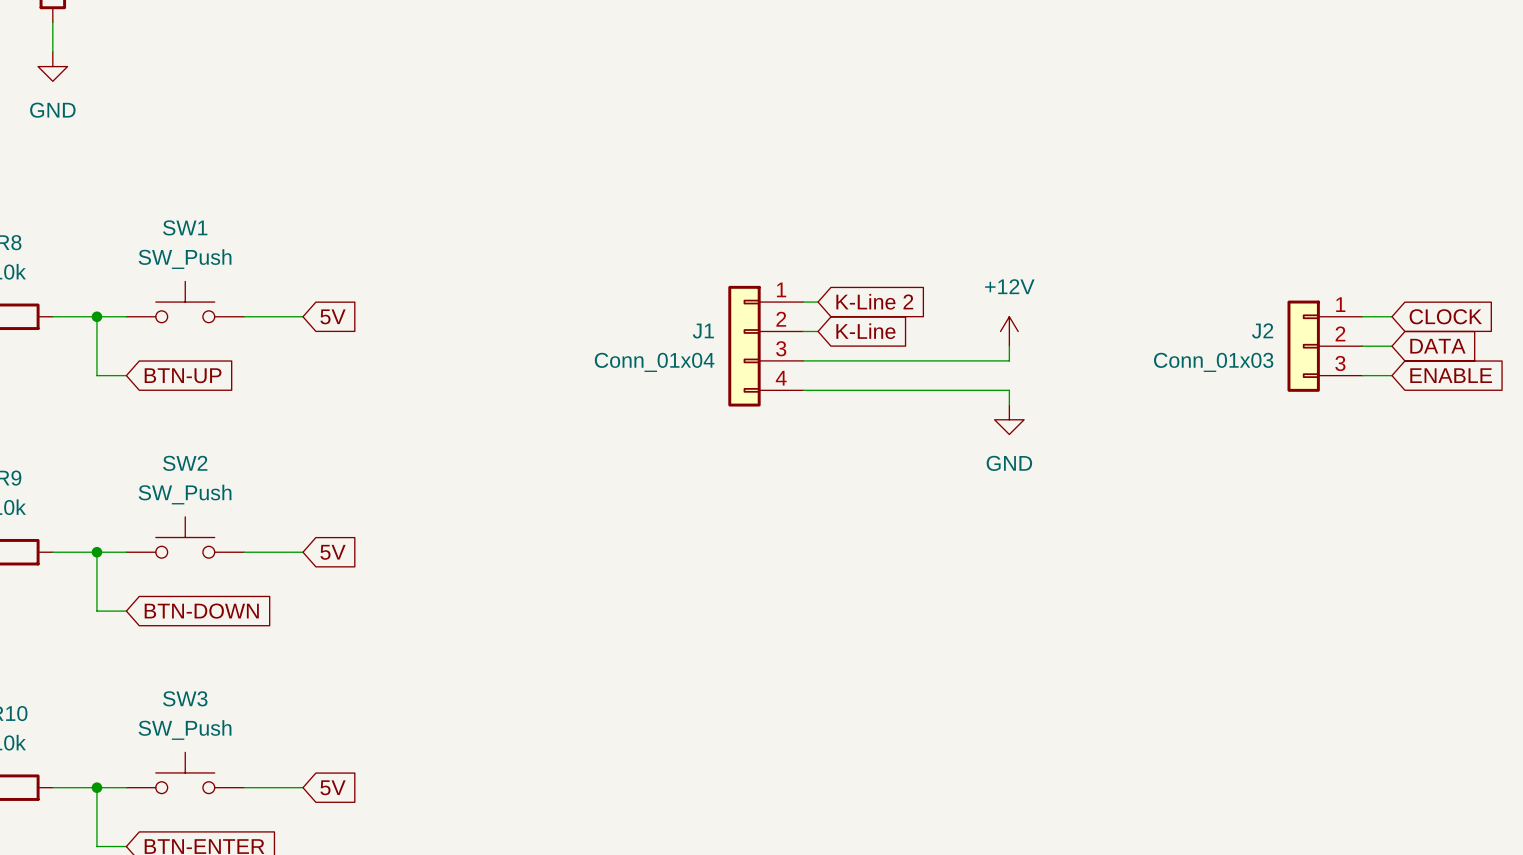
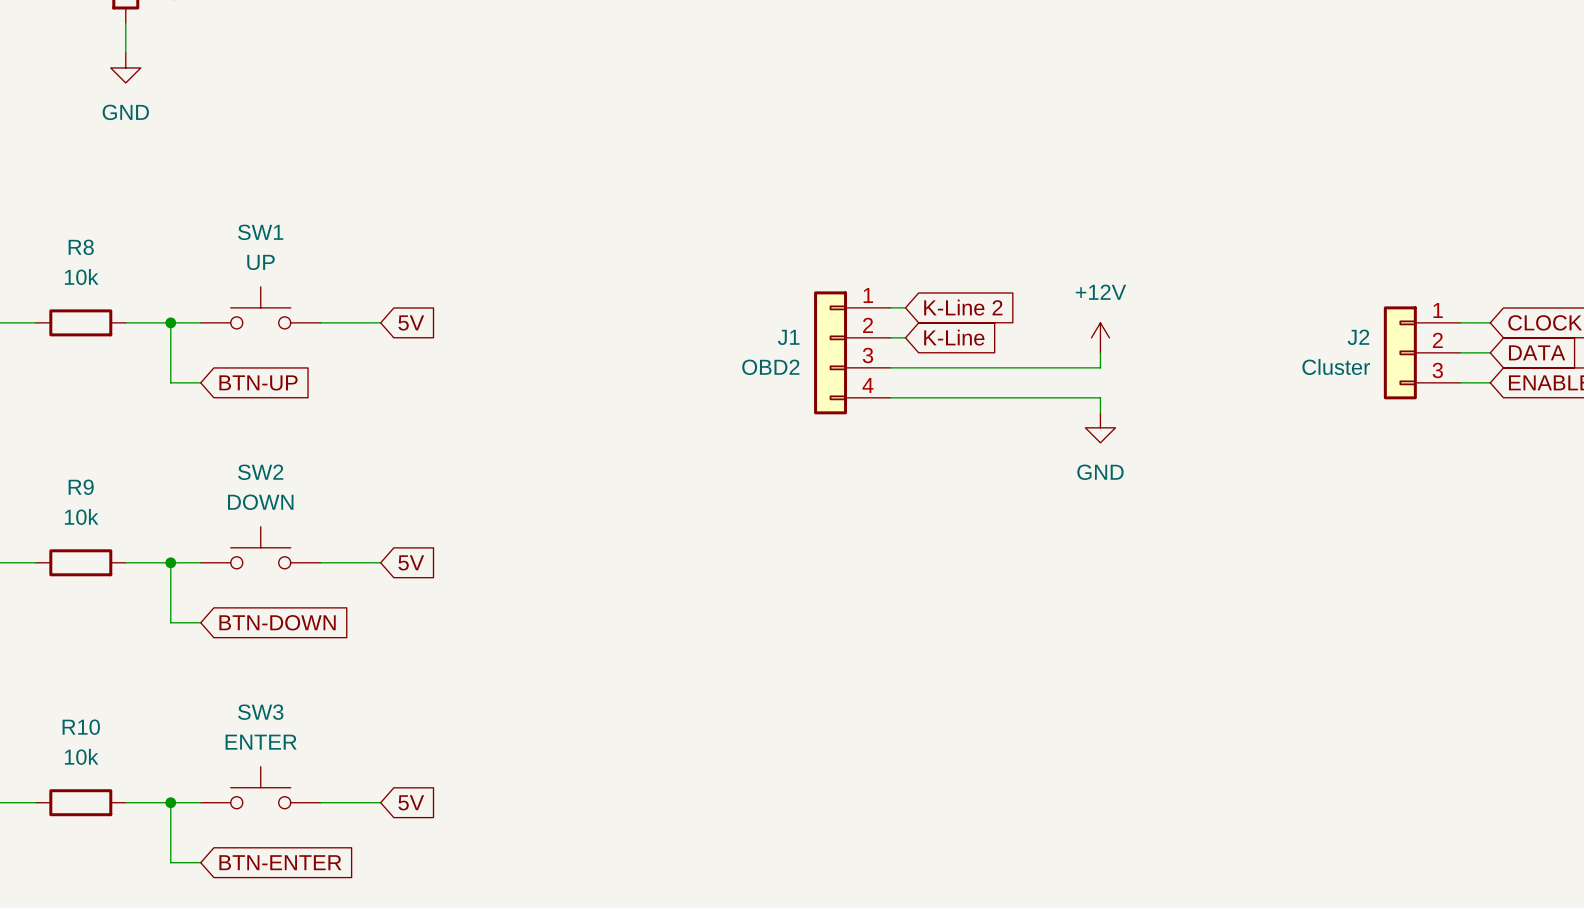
SW1 value: SW_Push (185, 259) -> UP (261, 262)
J1 value: Conn_01x04 (654, 362) -> OBD2 (770, 367)
J2 value: Conn_01x03 (1213, 362) -> Cluster (1336, 367)
SW2 value: SW_Push (185, 494) -> DOWN (260, 502)
SW3 value: SW_Push (185, 730) -> ENTER (261, 742)

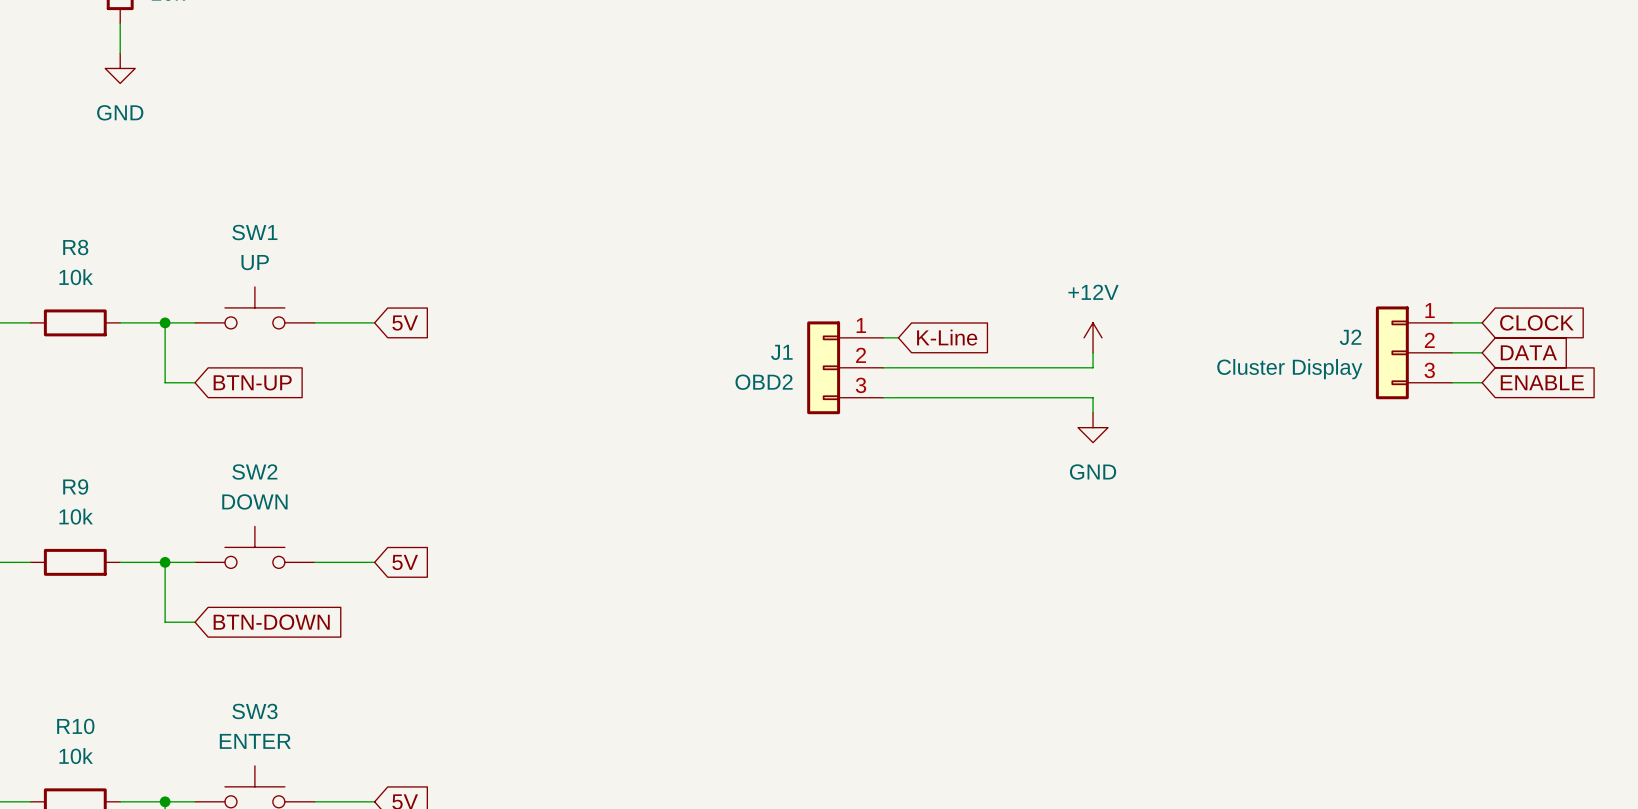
J1 symbol: [814, 291, 891, 415] -> [807, 321, 884, 415]
wire: (890, 307) (905, 307) -> none
global label: K-Line 2 (963, 307) -> none
J2 value: Cluster (1336, 367) -> Cluster Display (1289, 369)

